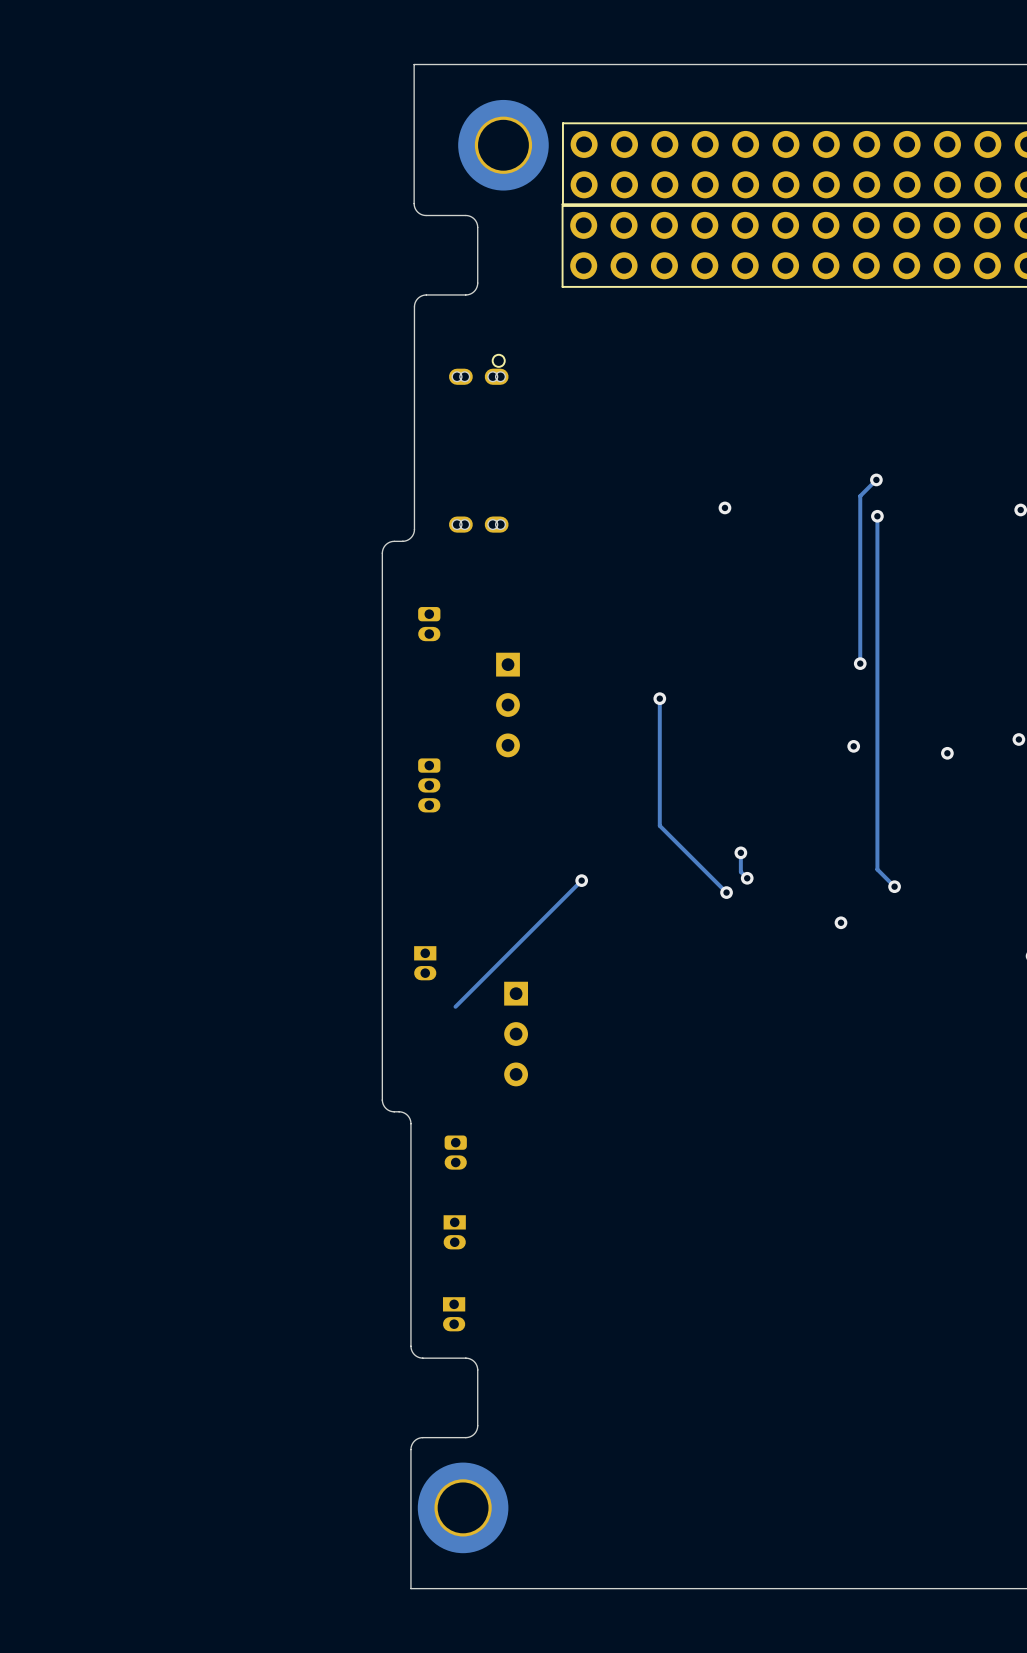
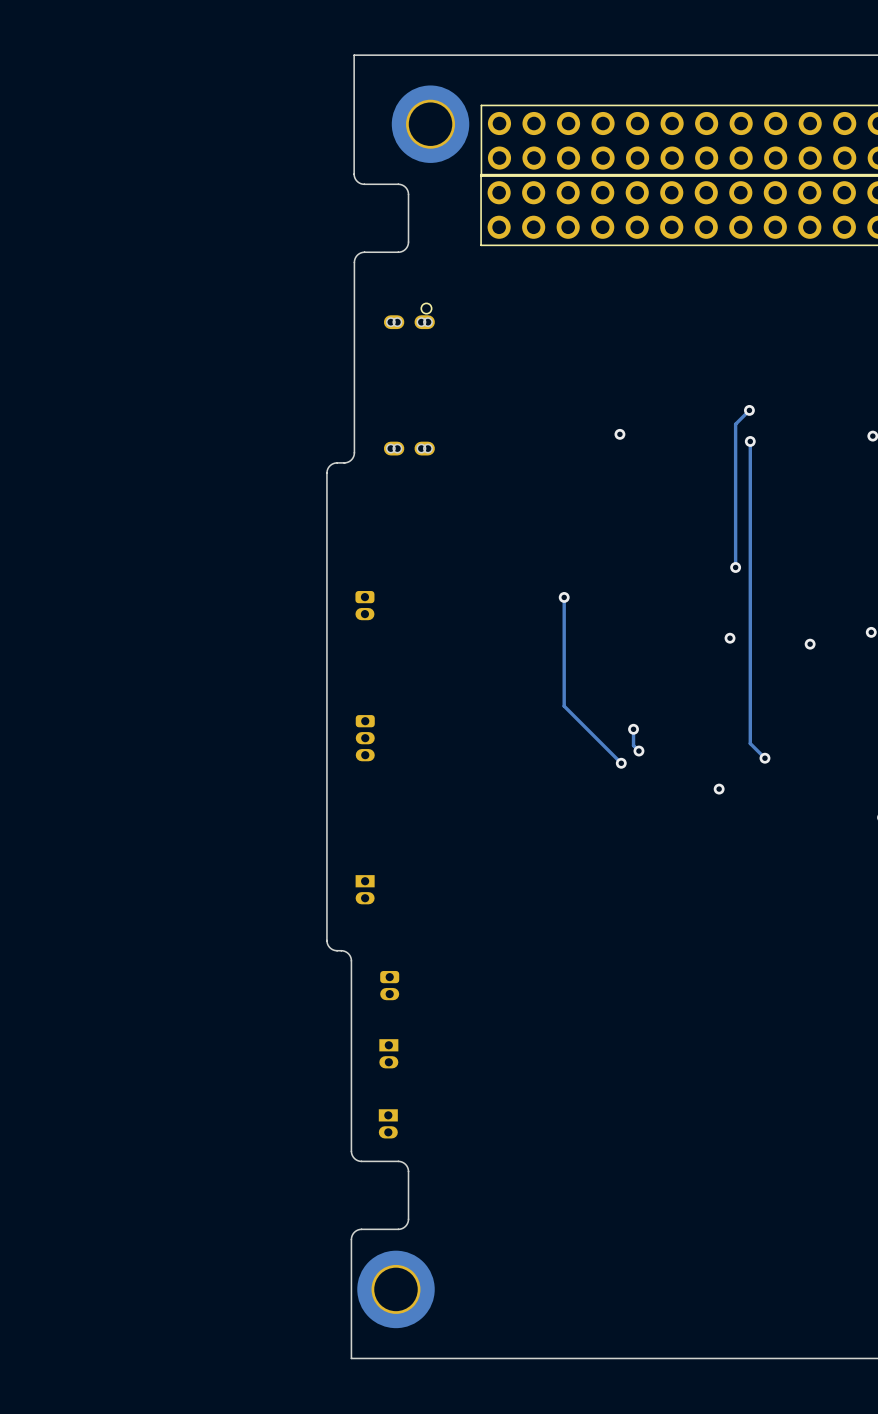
part position: (429, 624) -> (364, 605)
part: (508, 705) -> none
part position: (429, 785) -> (365, 738)
track: (581, 880) (455, 1006) -> none
via: (581, 880) -> none
part position: (425, 963) -> (365, 889)
part: (516, 1034) -> none

